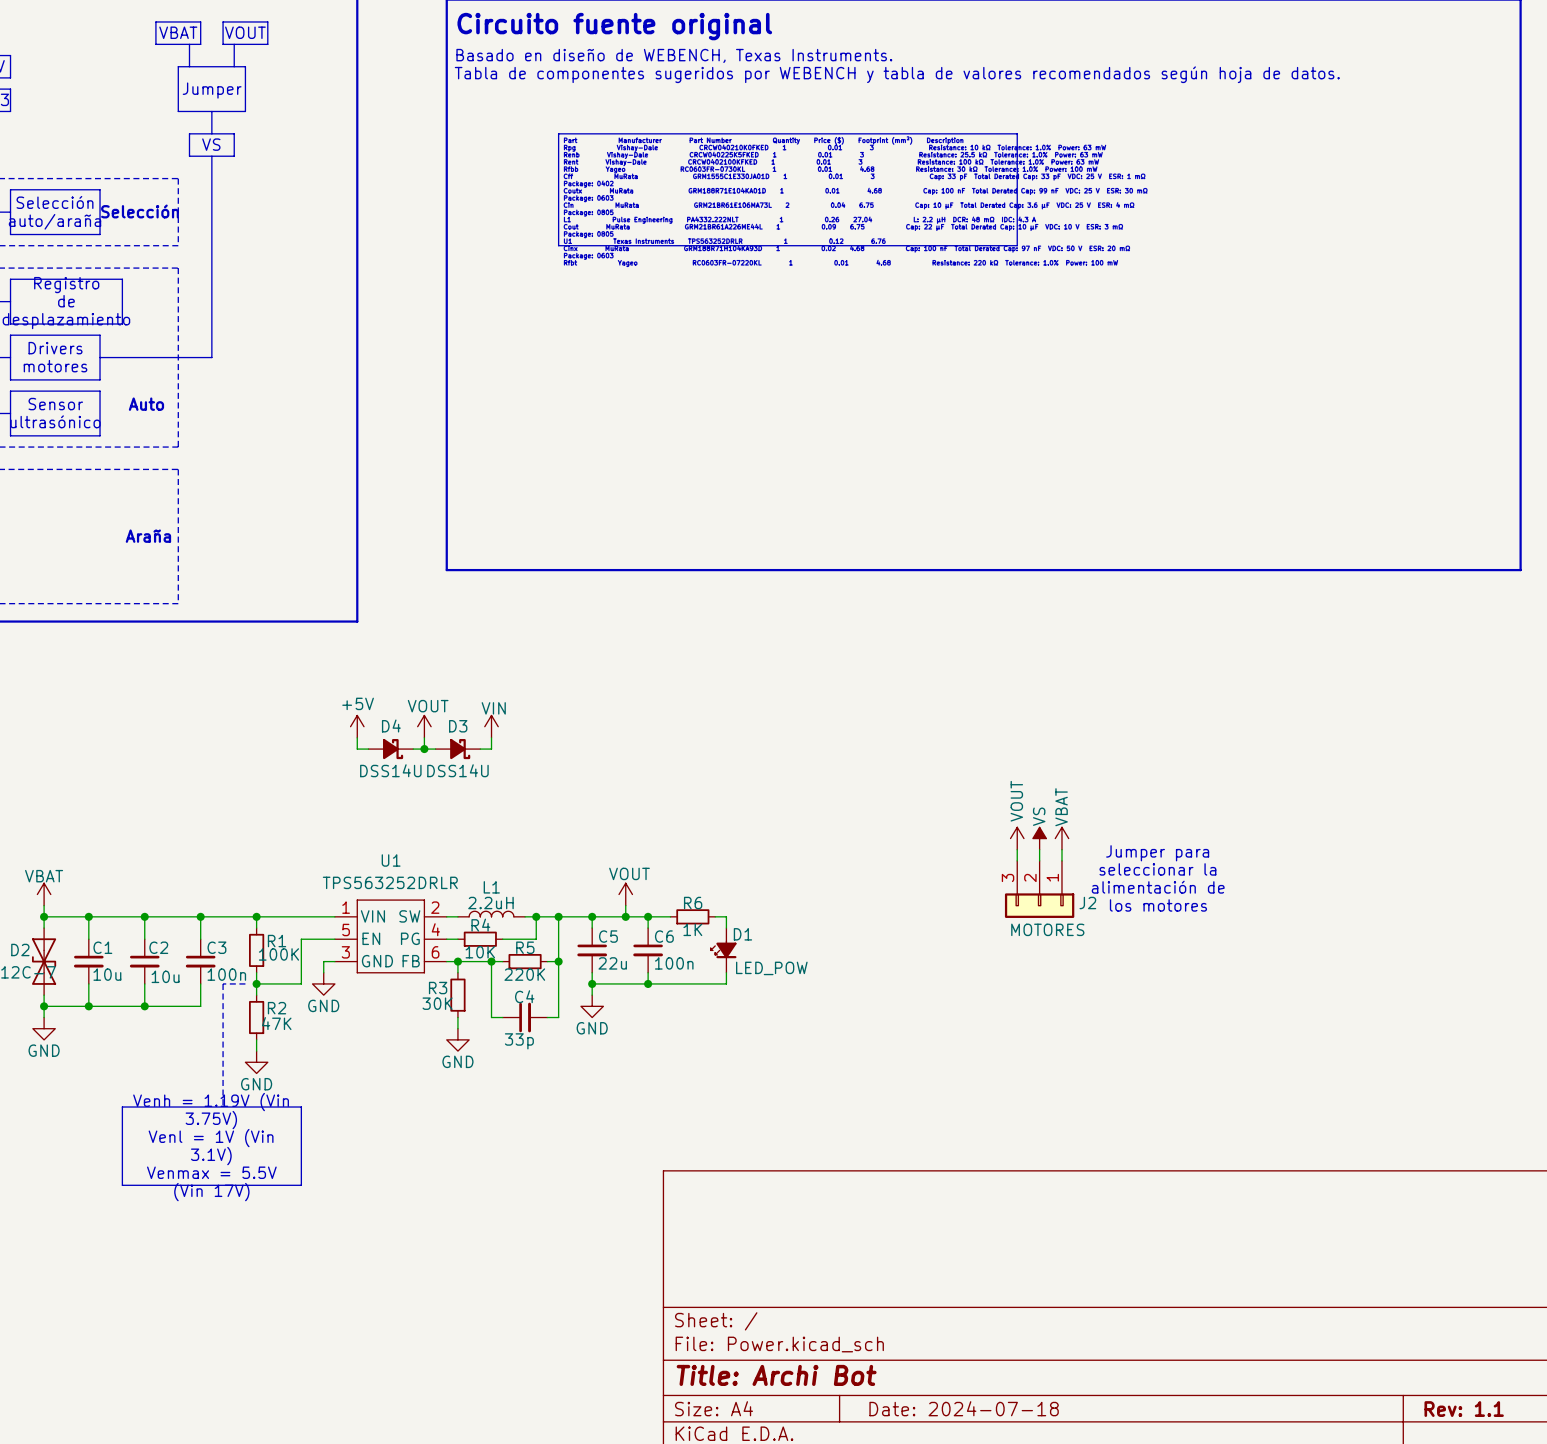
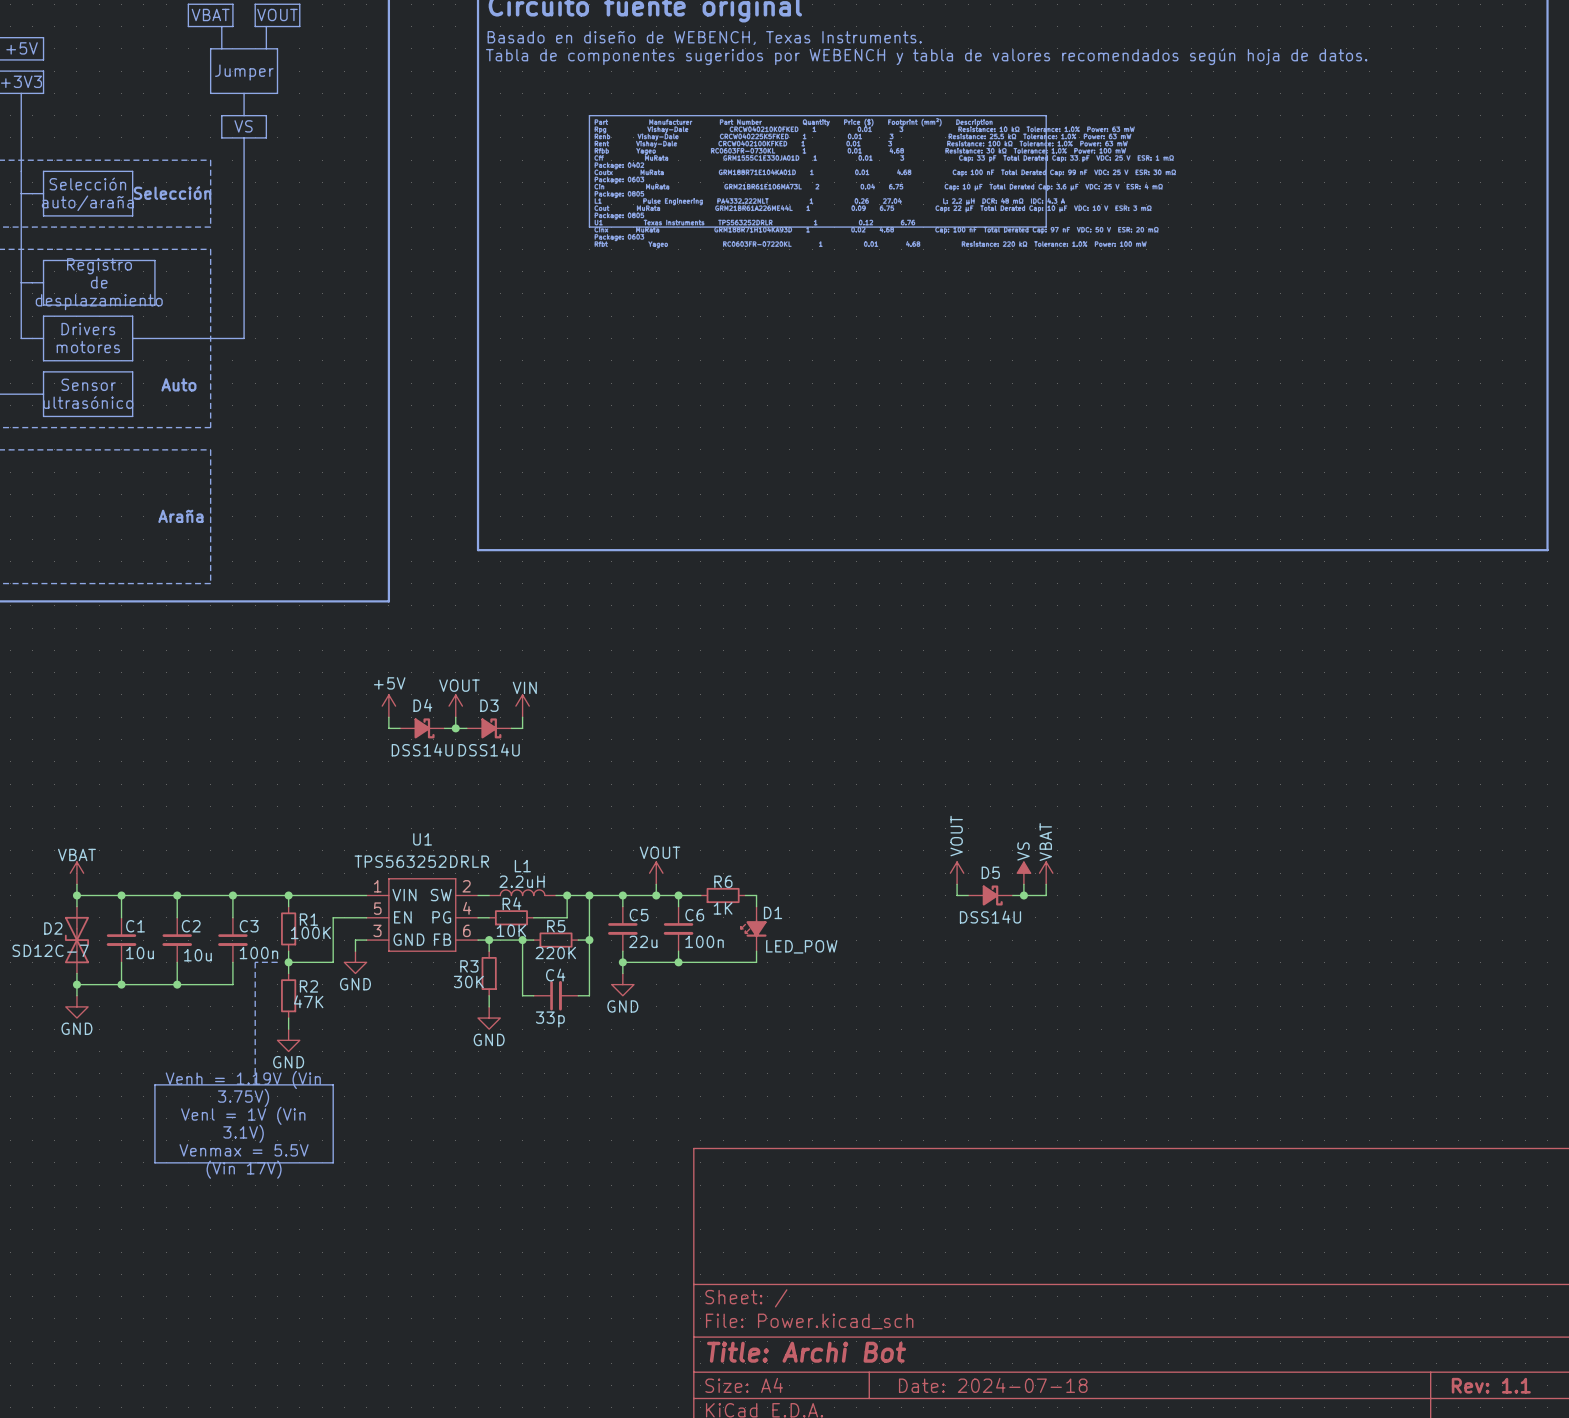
power symbol position: VOUT (1017, 838) -> VOUT (957, 873)
power symbol position: VS (1039, 838) -> VS (1023, 873)
power symbol position: VBAT (1061, 838) -> VBAT (1046, 873)
wire: (1017, 849) (1017, 860) -> (1023, 884) (1023, 895)
wire: (1039, 849) (1039, 860) -> none
wire: (1061, 849) (1061, 860) -> none
text: Jumper para (1157, 853) -> none
text: seleccionar la (1157, 869) -> none
text: alimentación de (1158, 887) -> none
J2: MOTORES (1039, 889) -> none
wire: none -> (957, 884) (957, 895) (968, 895)
wire: none -> (1046, 884) (1046, 895) (1012, 895)
text: los motores (1158, 905) -> none
D5: none -> DSS14U (990, 895)
junction: none -> (1023, 895)

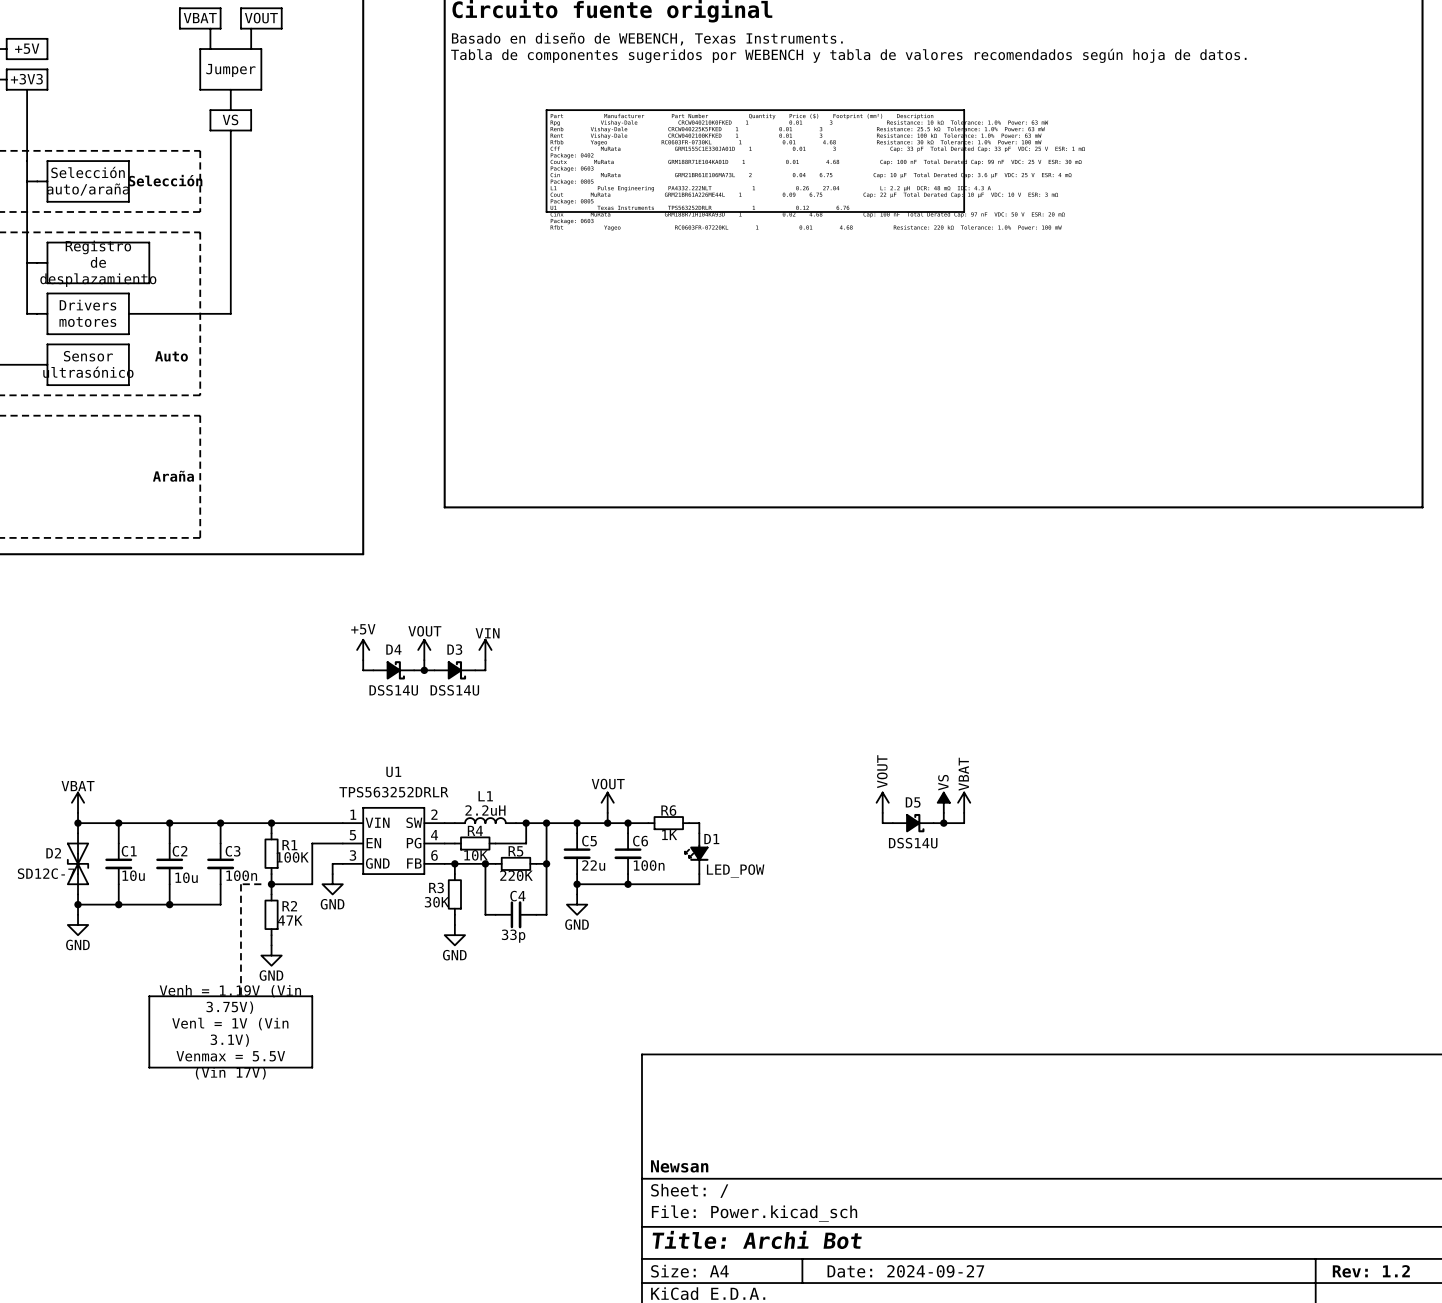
title block: none -> Newsan (679, 1166)
title block: Date: 2024-07-18 (993, 1385) -> Date: 2024-09-27 (905, 1271)
title block: Rev: 1.1 (1491, 1385) -> Rev: 1.2 (1371, 1271)

